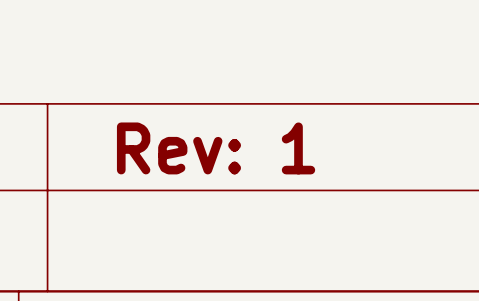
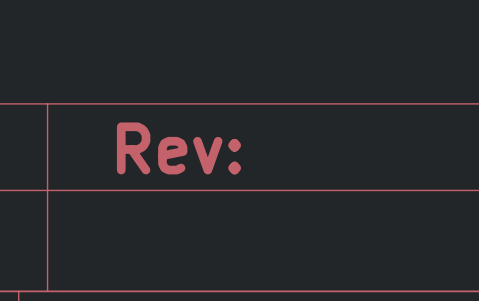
title block: Rev: 1 (216, 148) -> Rev: (178, 148)

